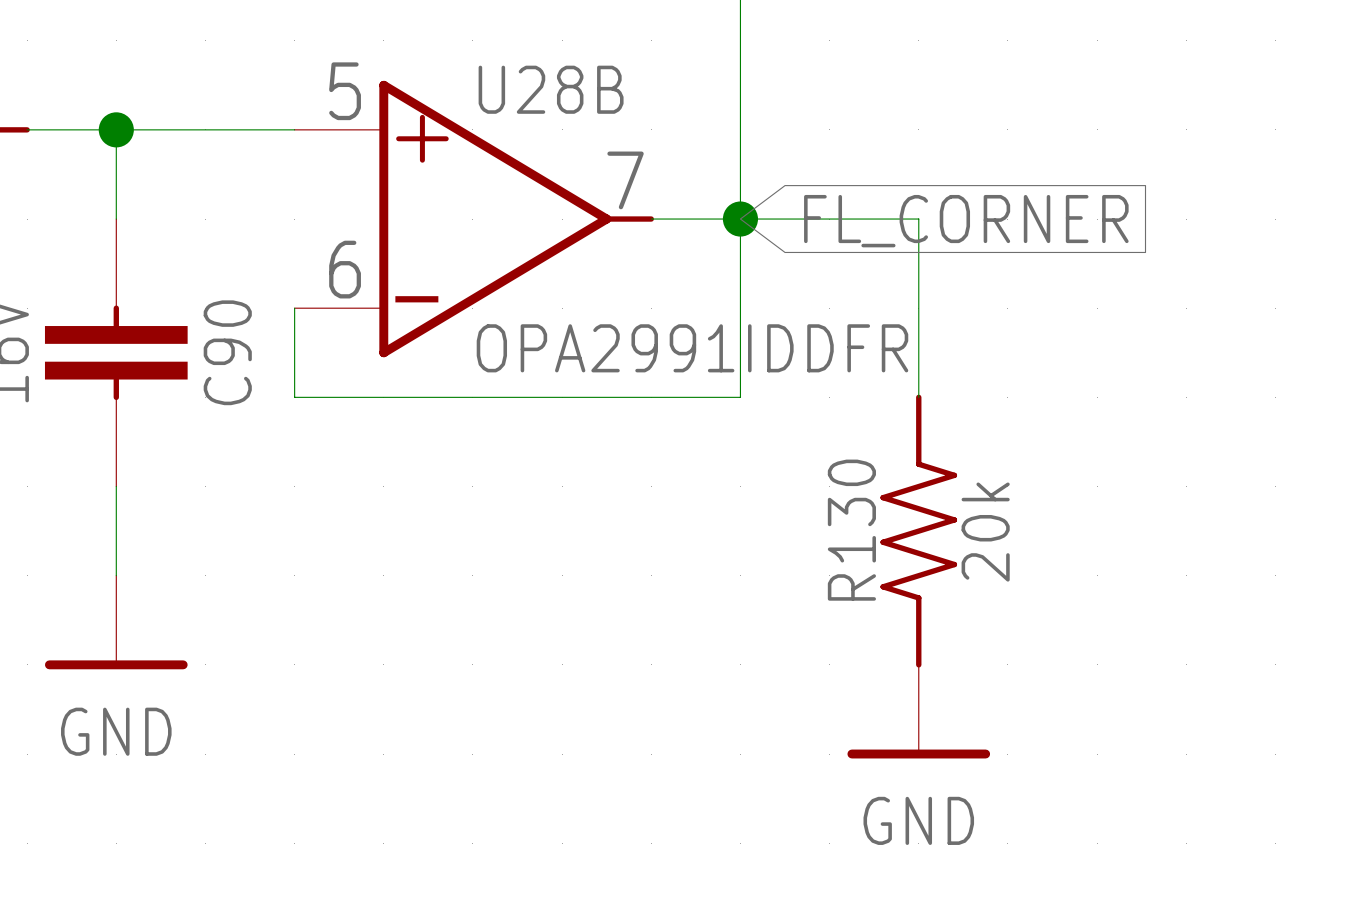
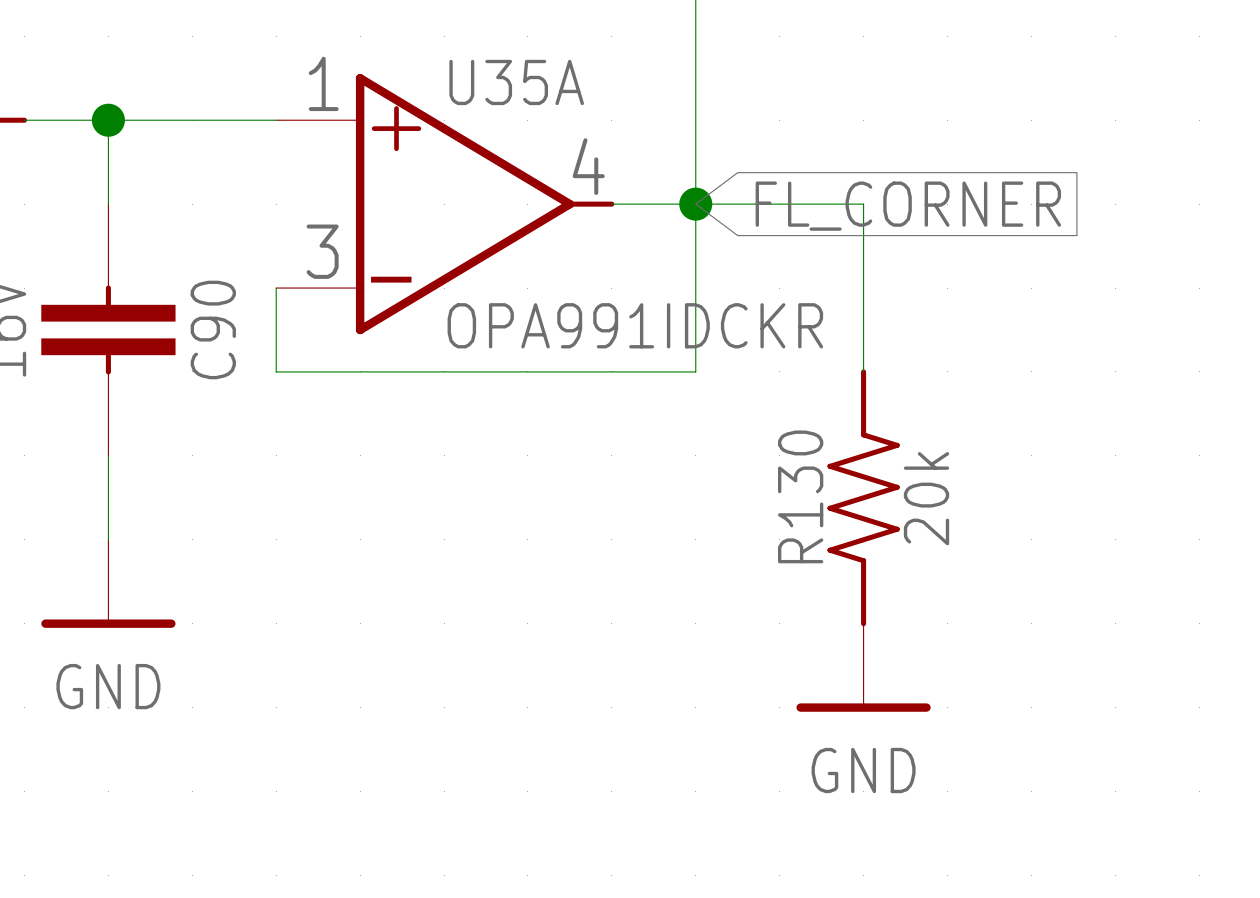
U28B name: U28B (551, 89) -> U35A (516, 82)
U28B pin number: 5 (345, 91) -> 1 (323, 83)
U28B pin number: 7 (625, 180) -> 4 (588, 166)
U28B pin number: 6 (345, 269) -> 3 (322, 251)
U28B text: OPA2991IDDFR (692, 348) -> OPA991IDCKR (635, 325)

